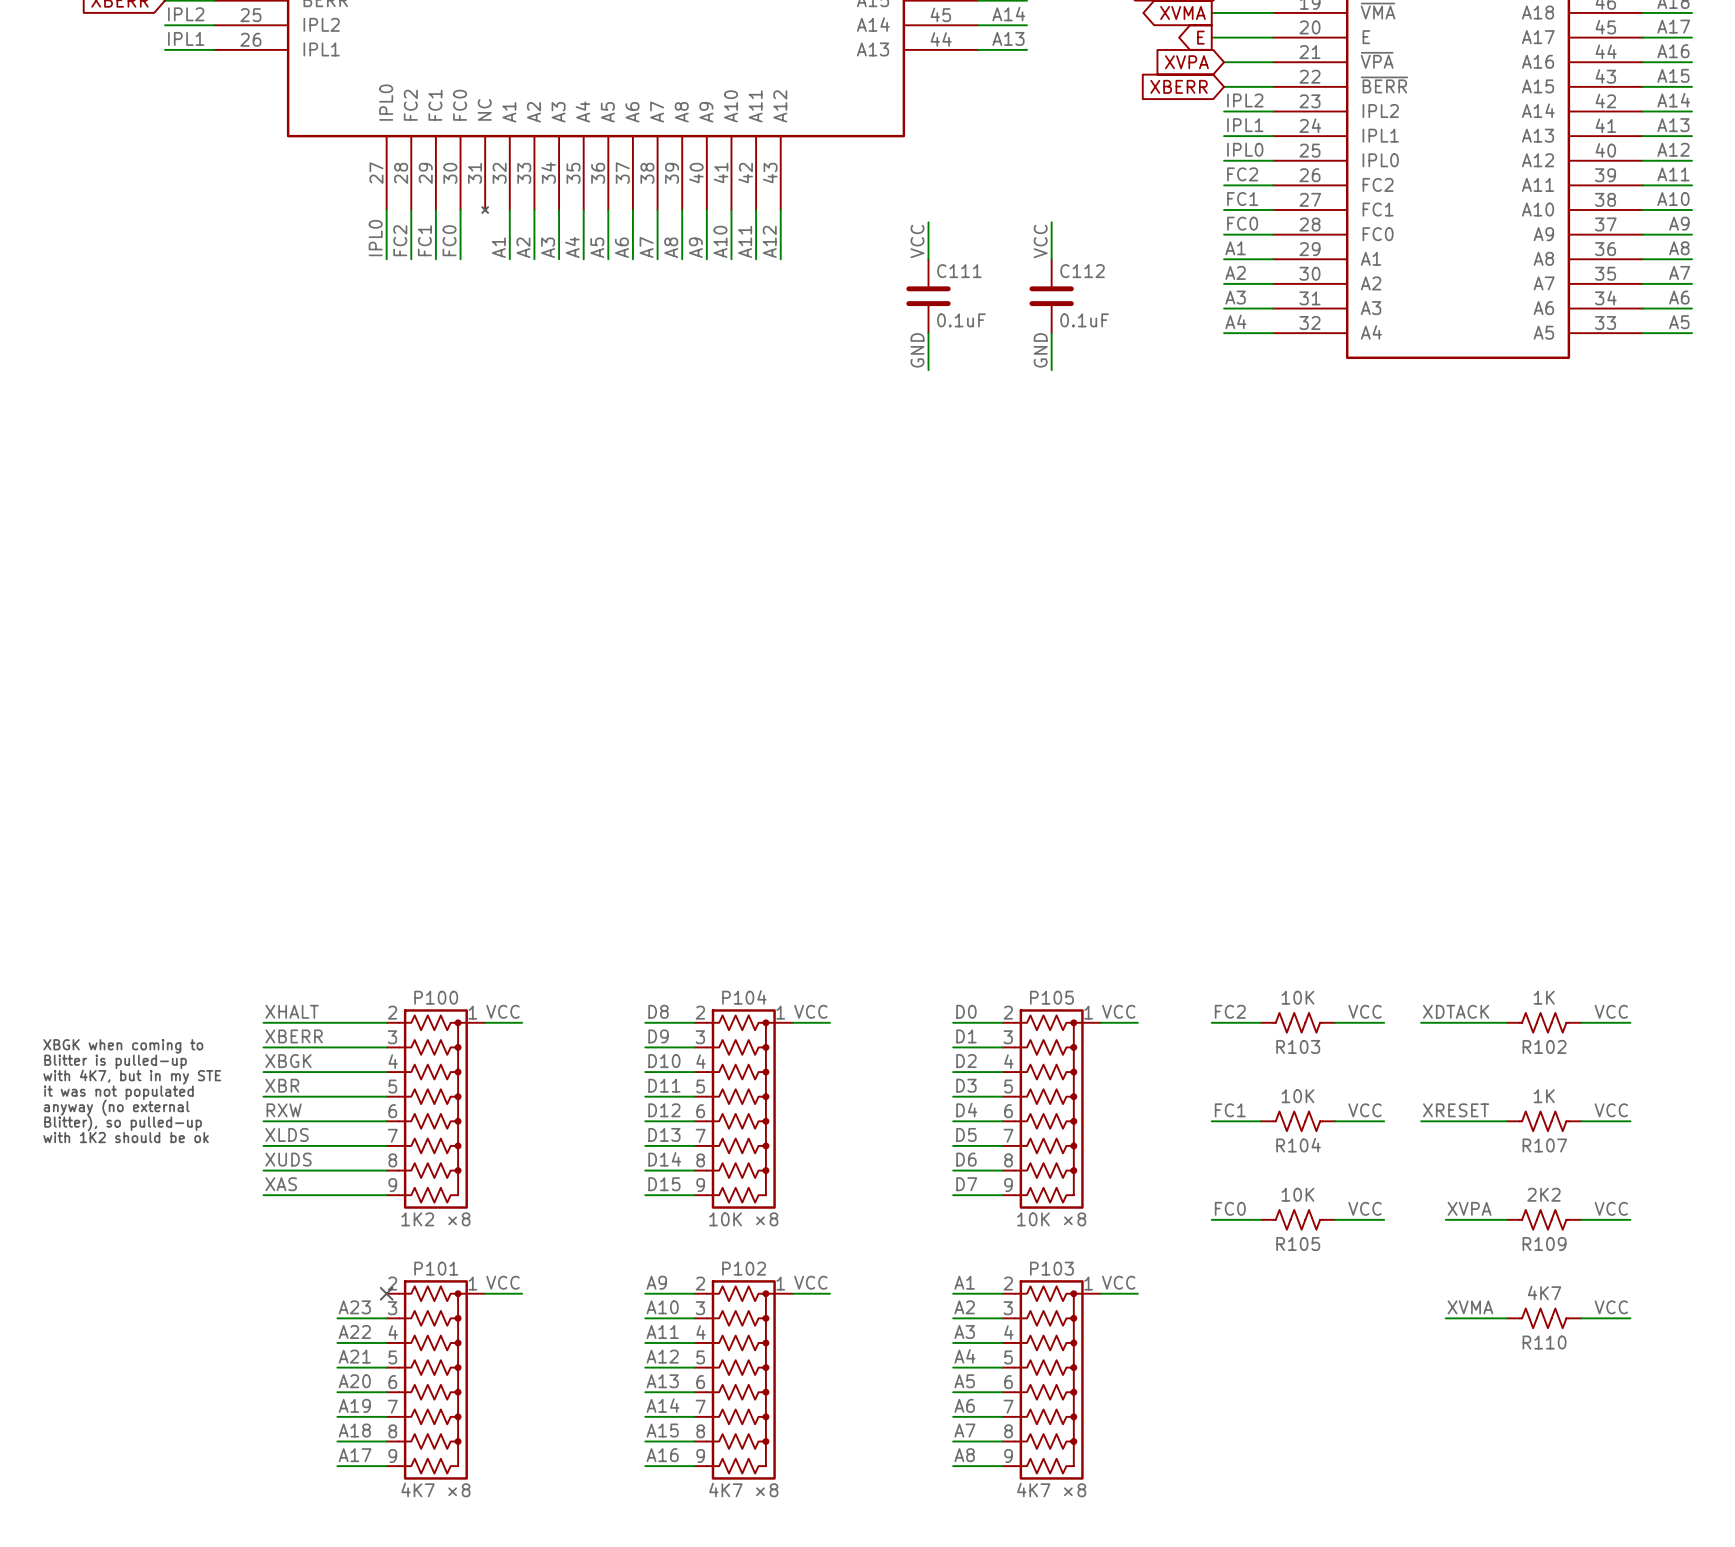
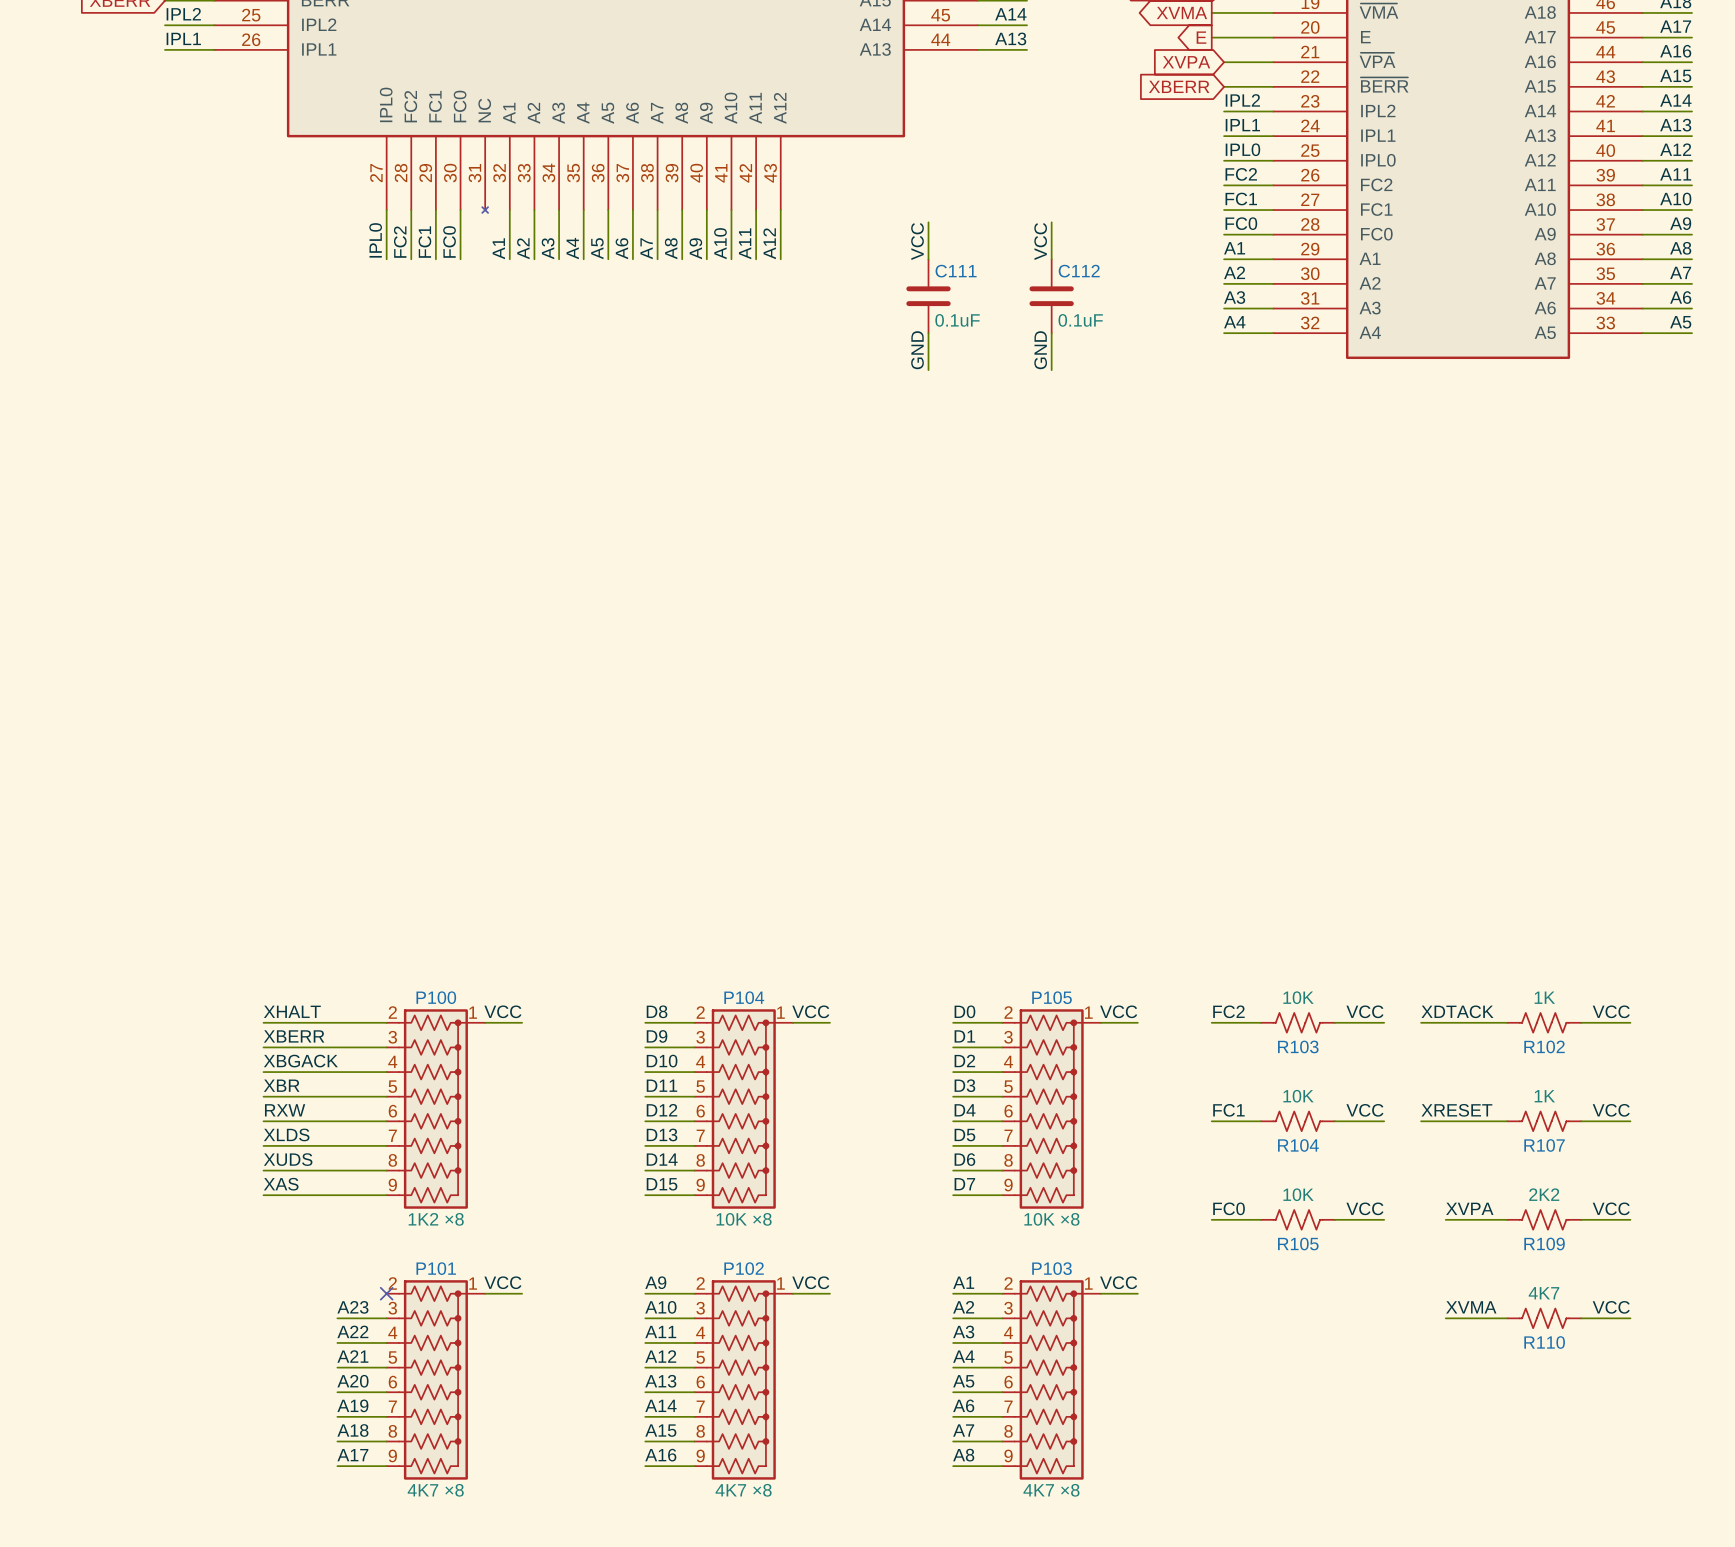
text: XBGK when coming to (123, 1046) -> none
text: Blitter is pulled-up (115, 1061) -> none
label: XBGK (288, 1061) -> XBGACK (300, 1061)
text: with 4K7, but in my STE (132, 1077) -> none
text: it was not populated (118, 1092) -> none
text: anyway (no external (116, 1107) -> none
text: Blitter), so pulled-up (123, 1123) -> none
text: with 1K2 should be ok (126, 1137) -> none

